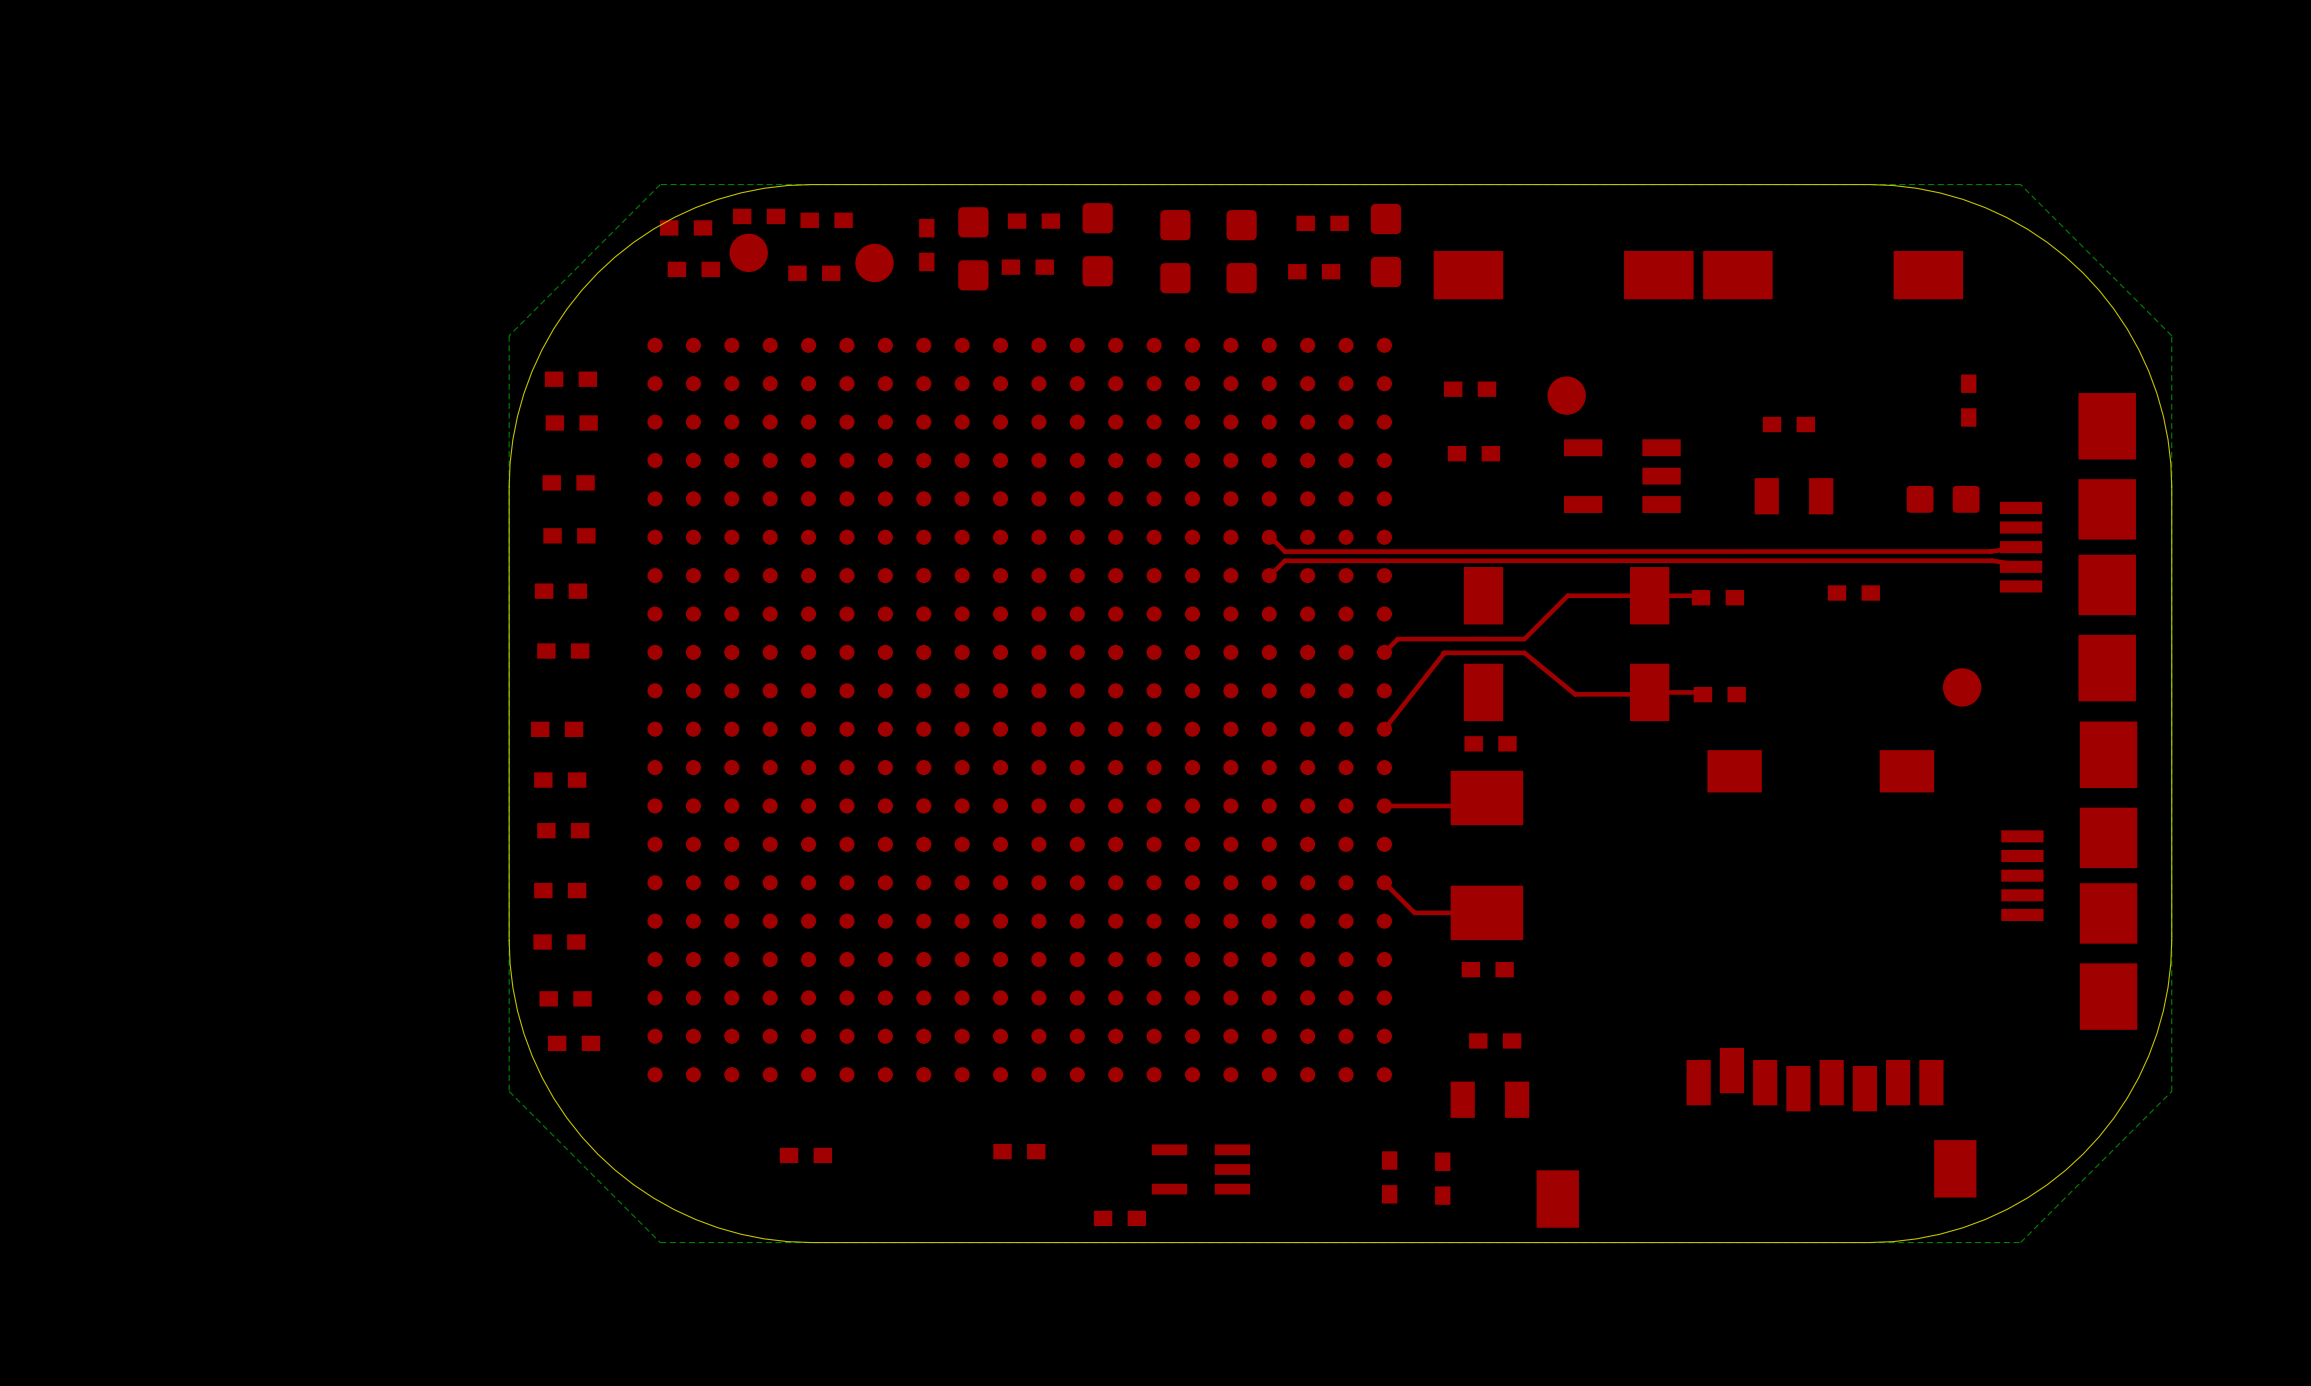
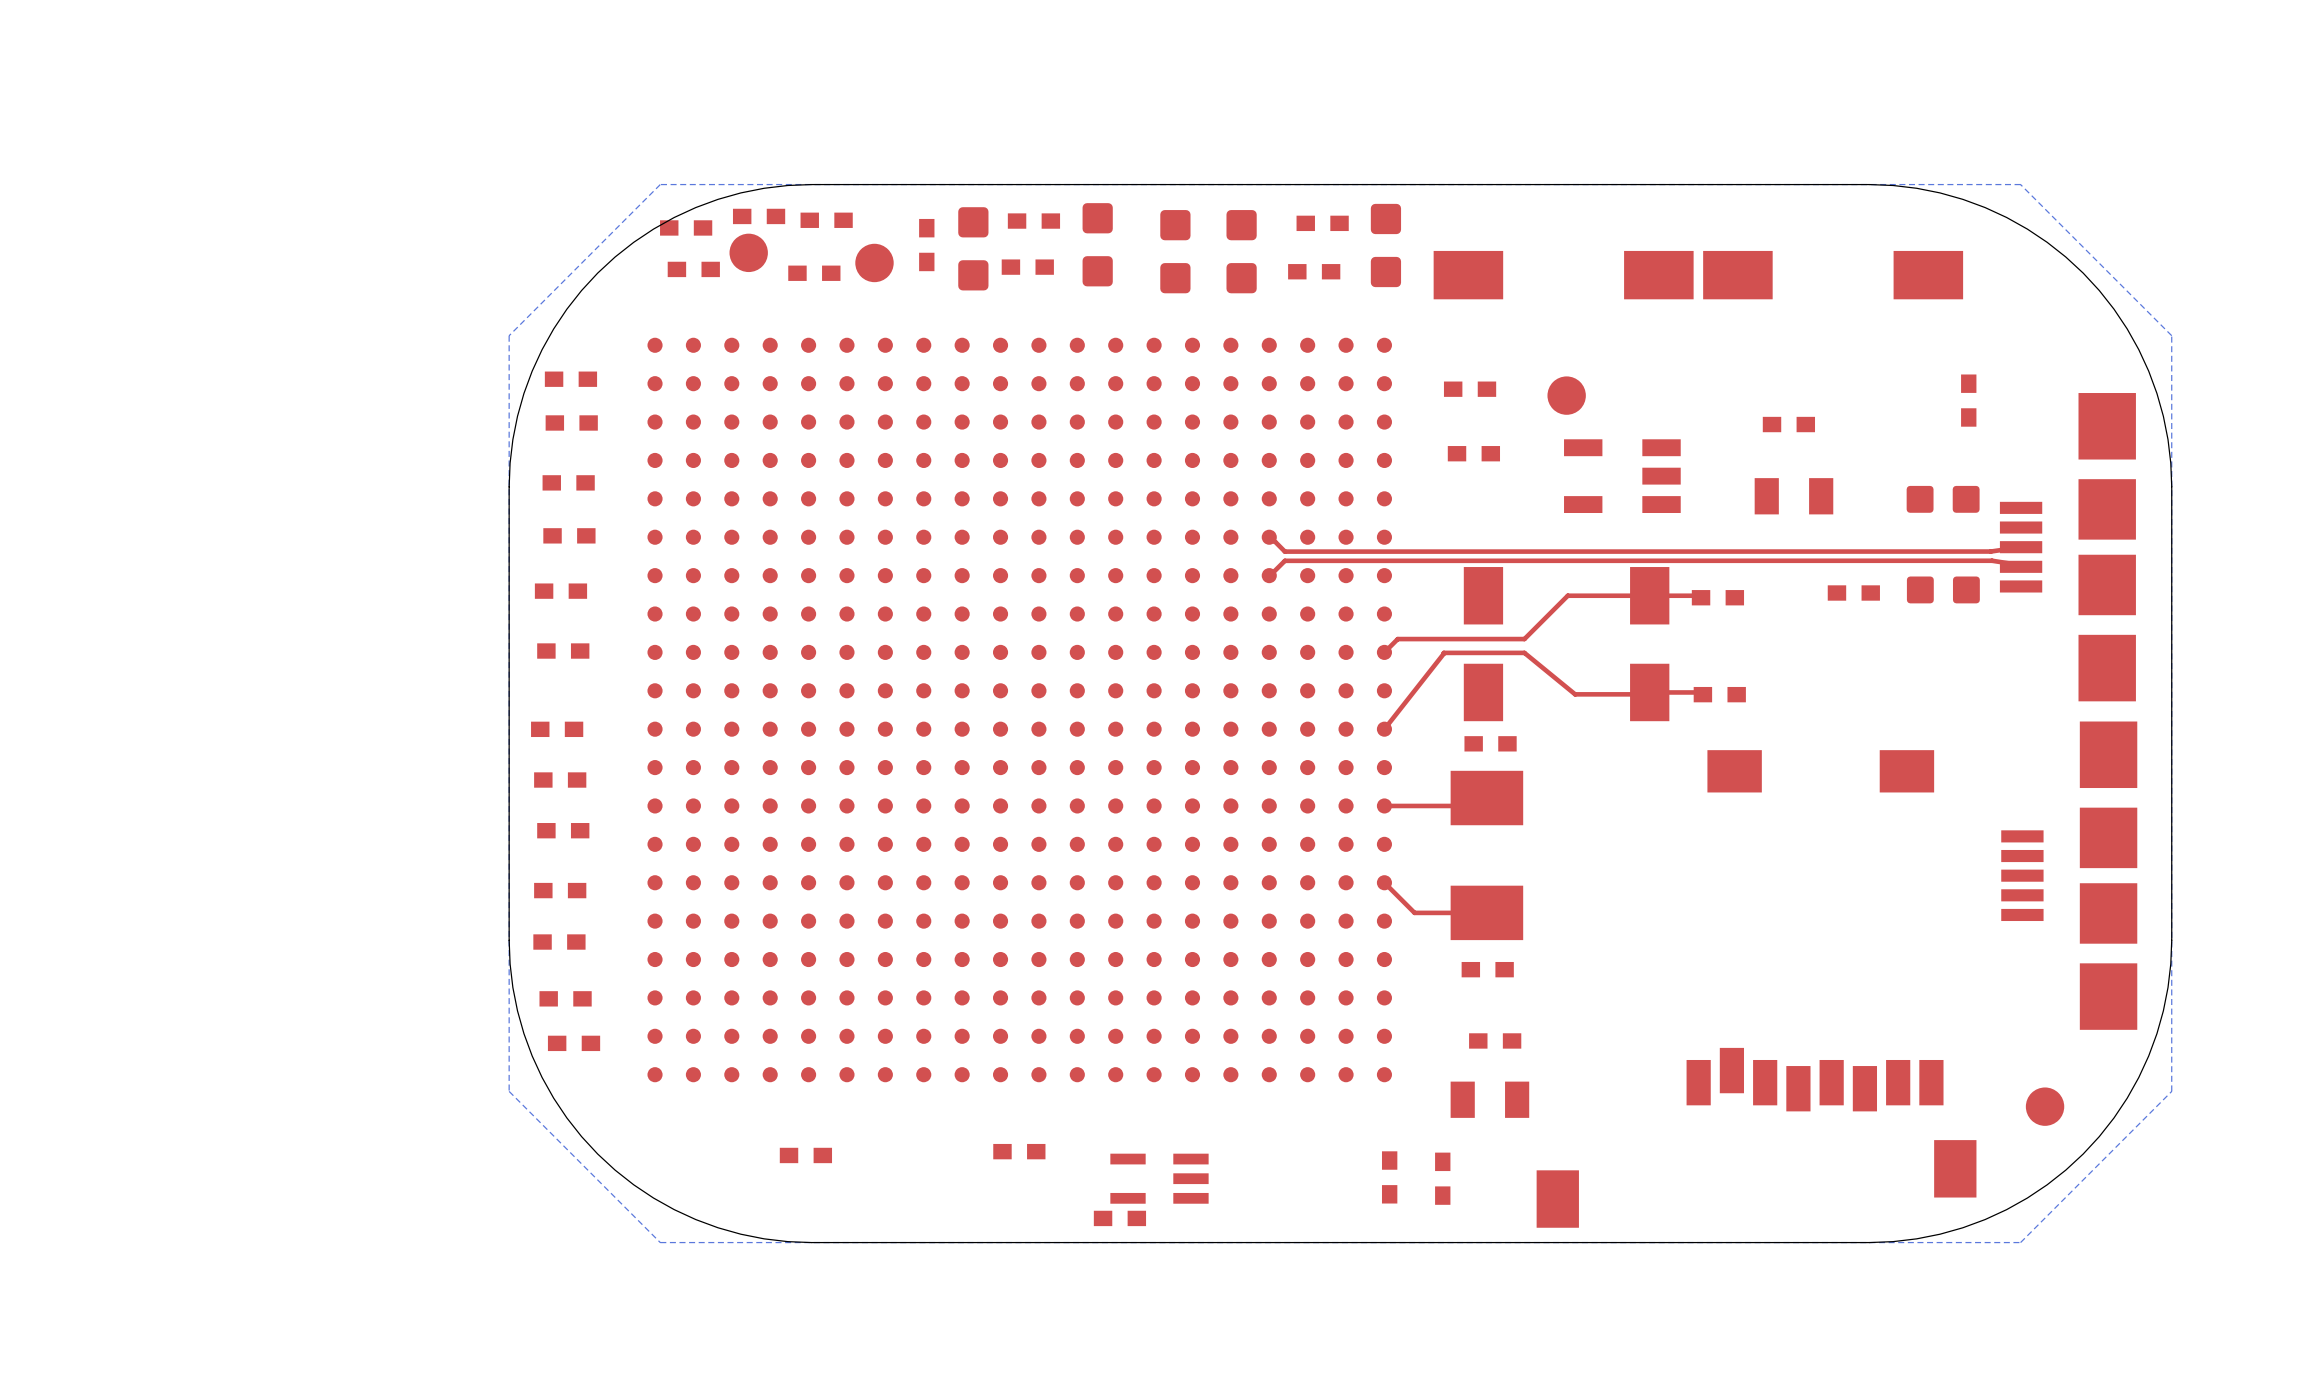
part: none -> (1943, 589)
part position: (1962, 687) -> (2045, 1106)
part position: (1200, 1169) -> (1159, 1178)

